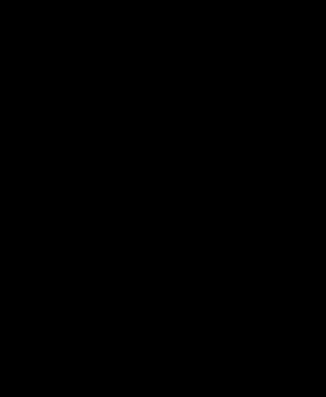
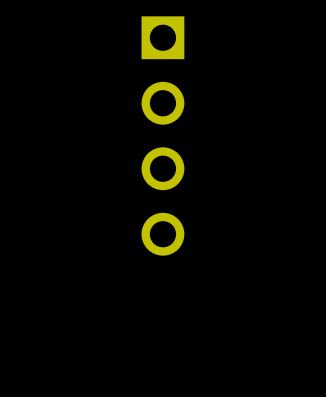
part: none -> (162, 136)

